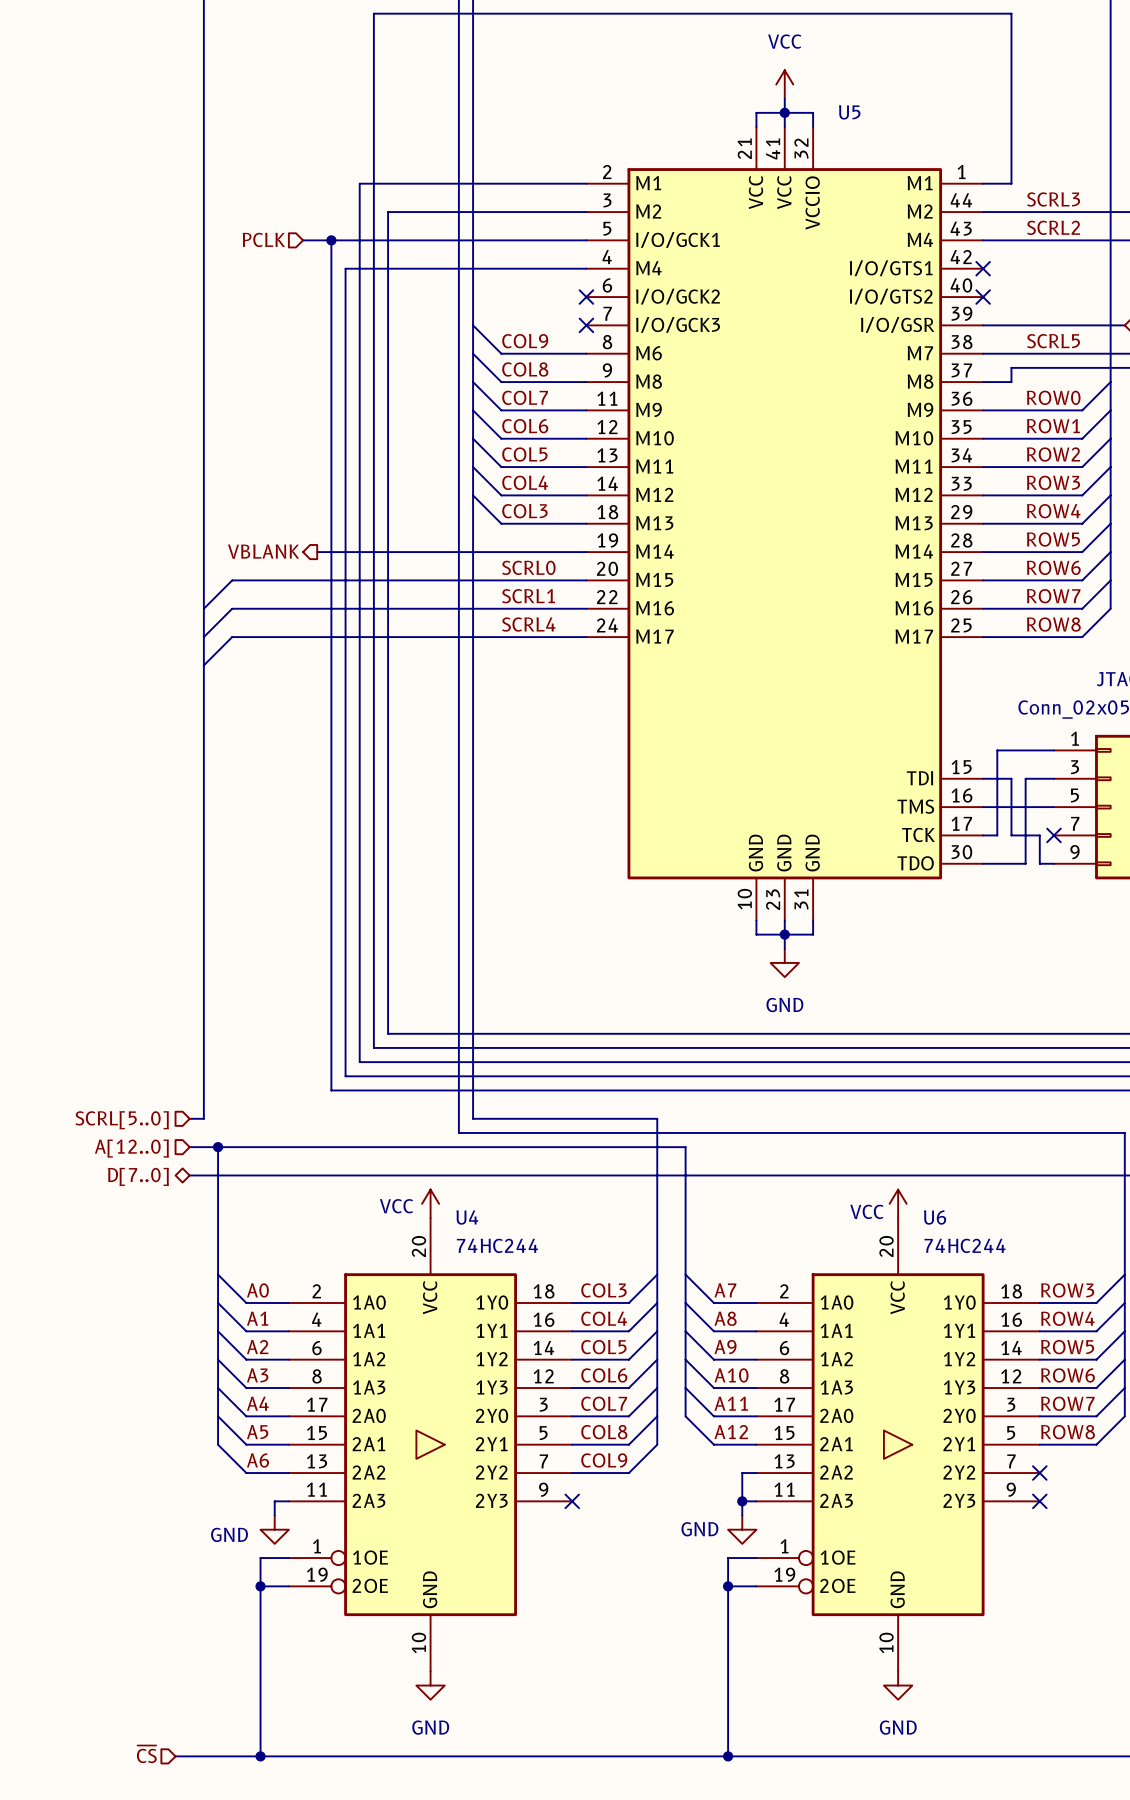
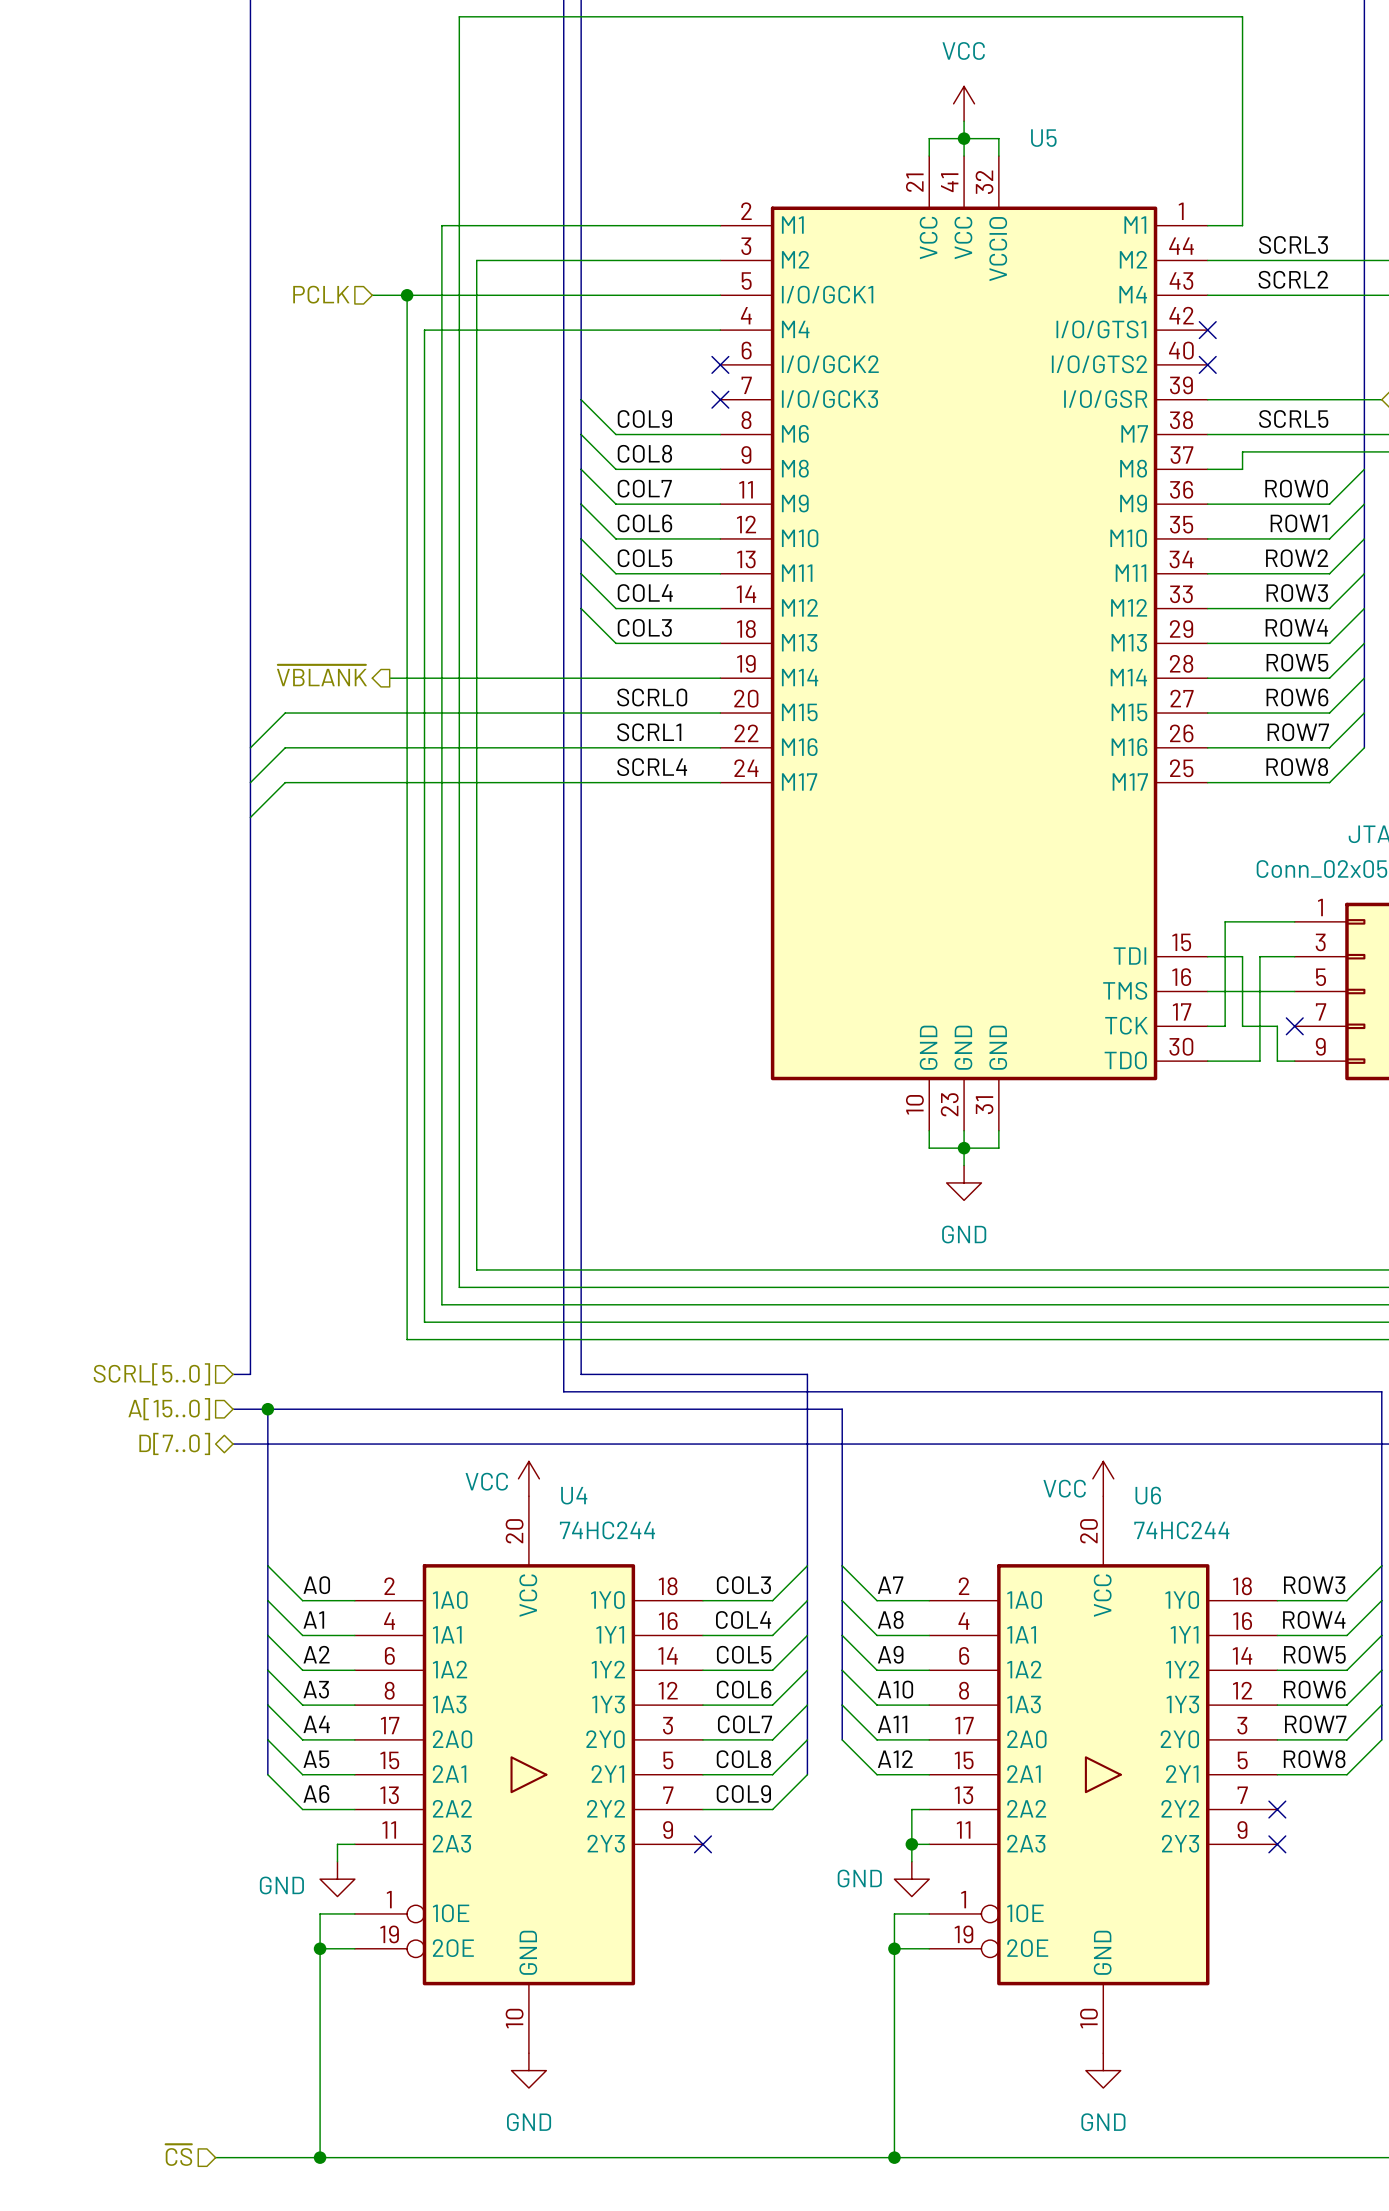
hierarchical label: VBLANK (263, 551) -> ~{VBLANK} (321, 675)
hierarchical label: A[12..0] (131, 1148) -> A[15..0] (169, 1409)

